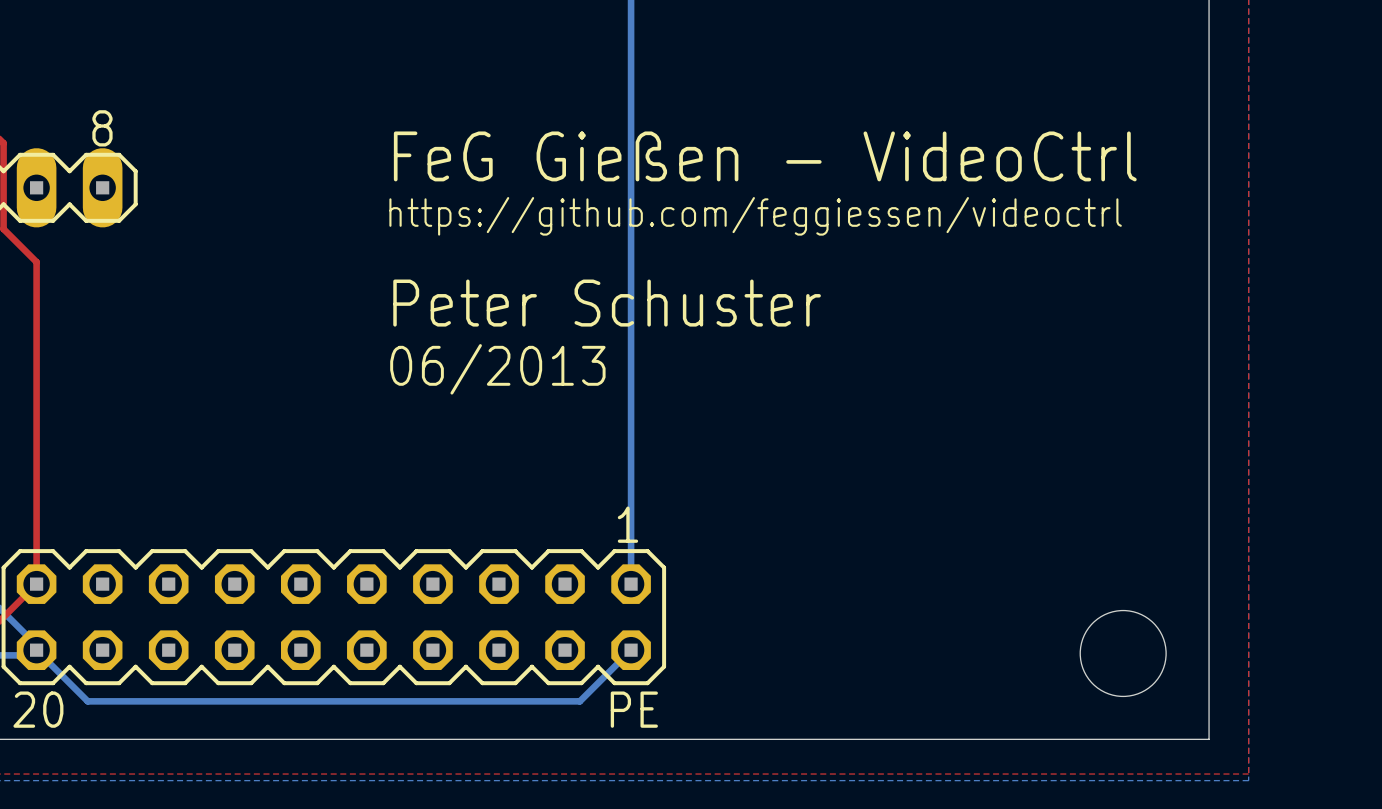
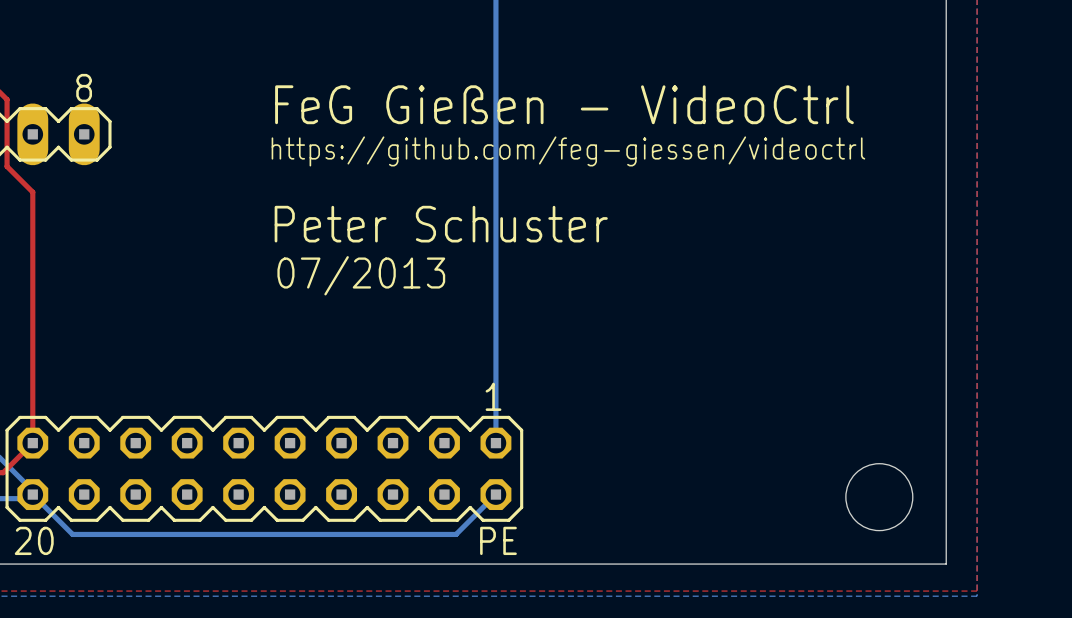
text position: FeG Gießen - VideoCtrl (765, 156) -> FeG Gießen - VideoCtrl (564, 104)
text: https://github.com/feggiessen/videoctrl (755, 216) -> https://github.com/feg-giessen/videoctrl (568, 151)
text position: Peter Schuster (607, 303) -> Peter Schuster (441, 224)
text: 06/2013 (497, 369) -> 07/2013 (361, 275)

